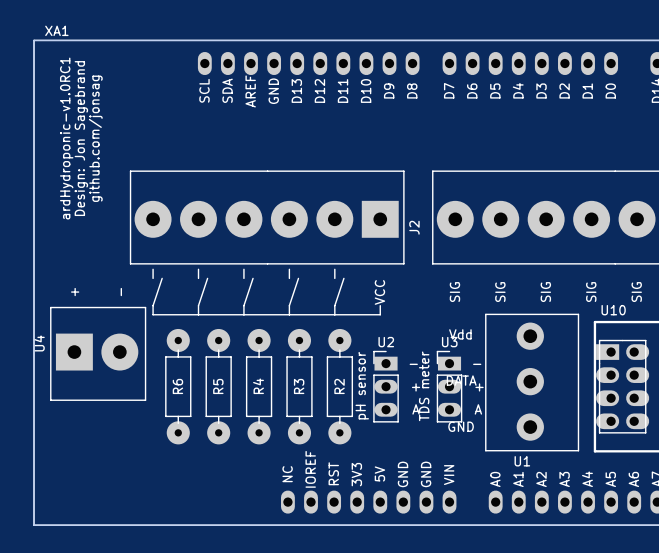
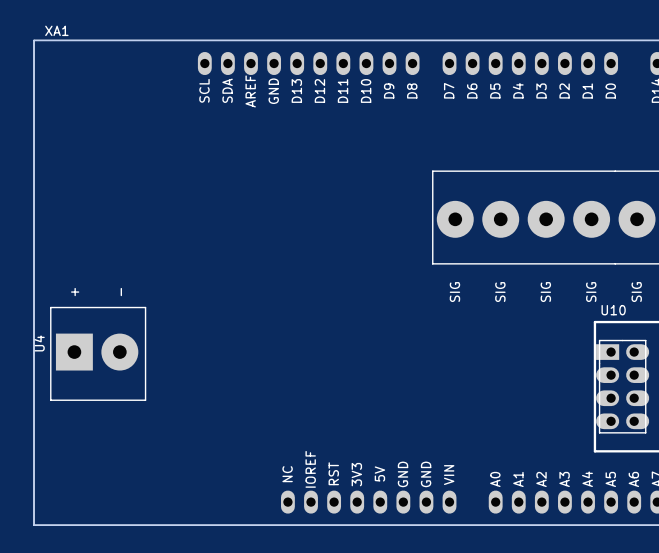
text: ardHydroponic-v1.0RC1 (66, 138) -> none
text: Design: Jon Sagebrand (81, 138) -> none
text: github.com/jonsag (95, 138) -> none
J2: (267, 242) -> none
U1: (532, 382) -> none
R6: (178, 386) -> none
R5: (218, 386) -> none
R4: (259, 386) -> none
R3: (299, 386) -> none
R2: (339, 386) -> none
U2: (386, 386) -> none
U3: (449, 386) -> none

